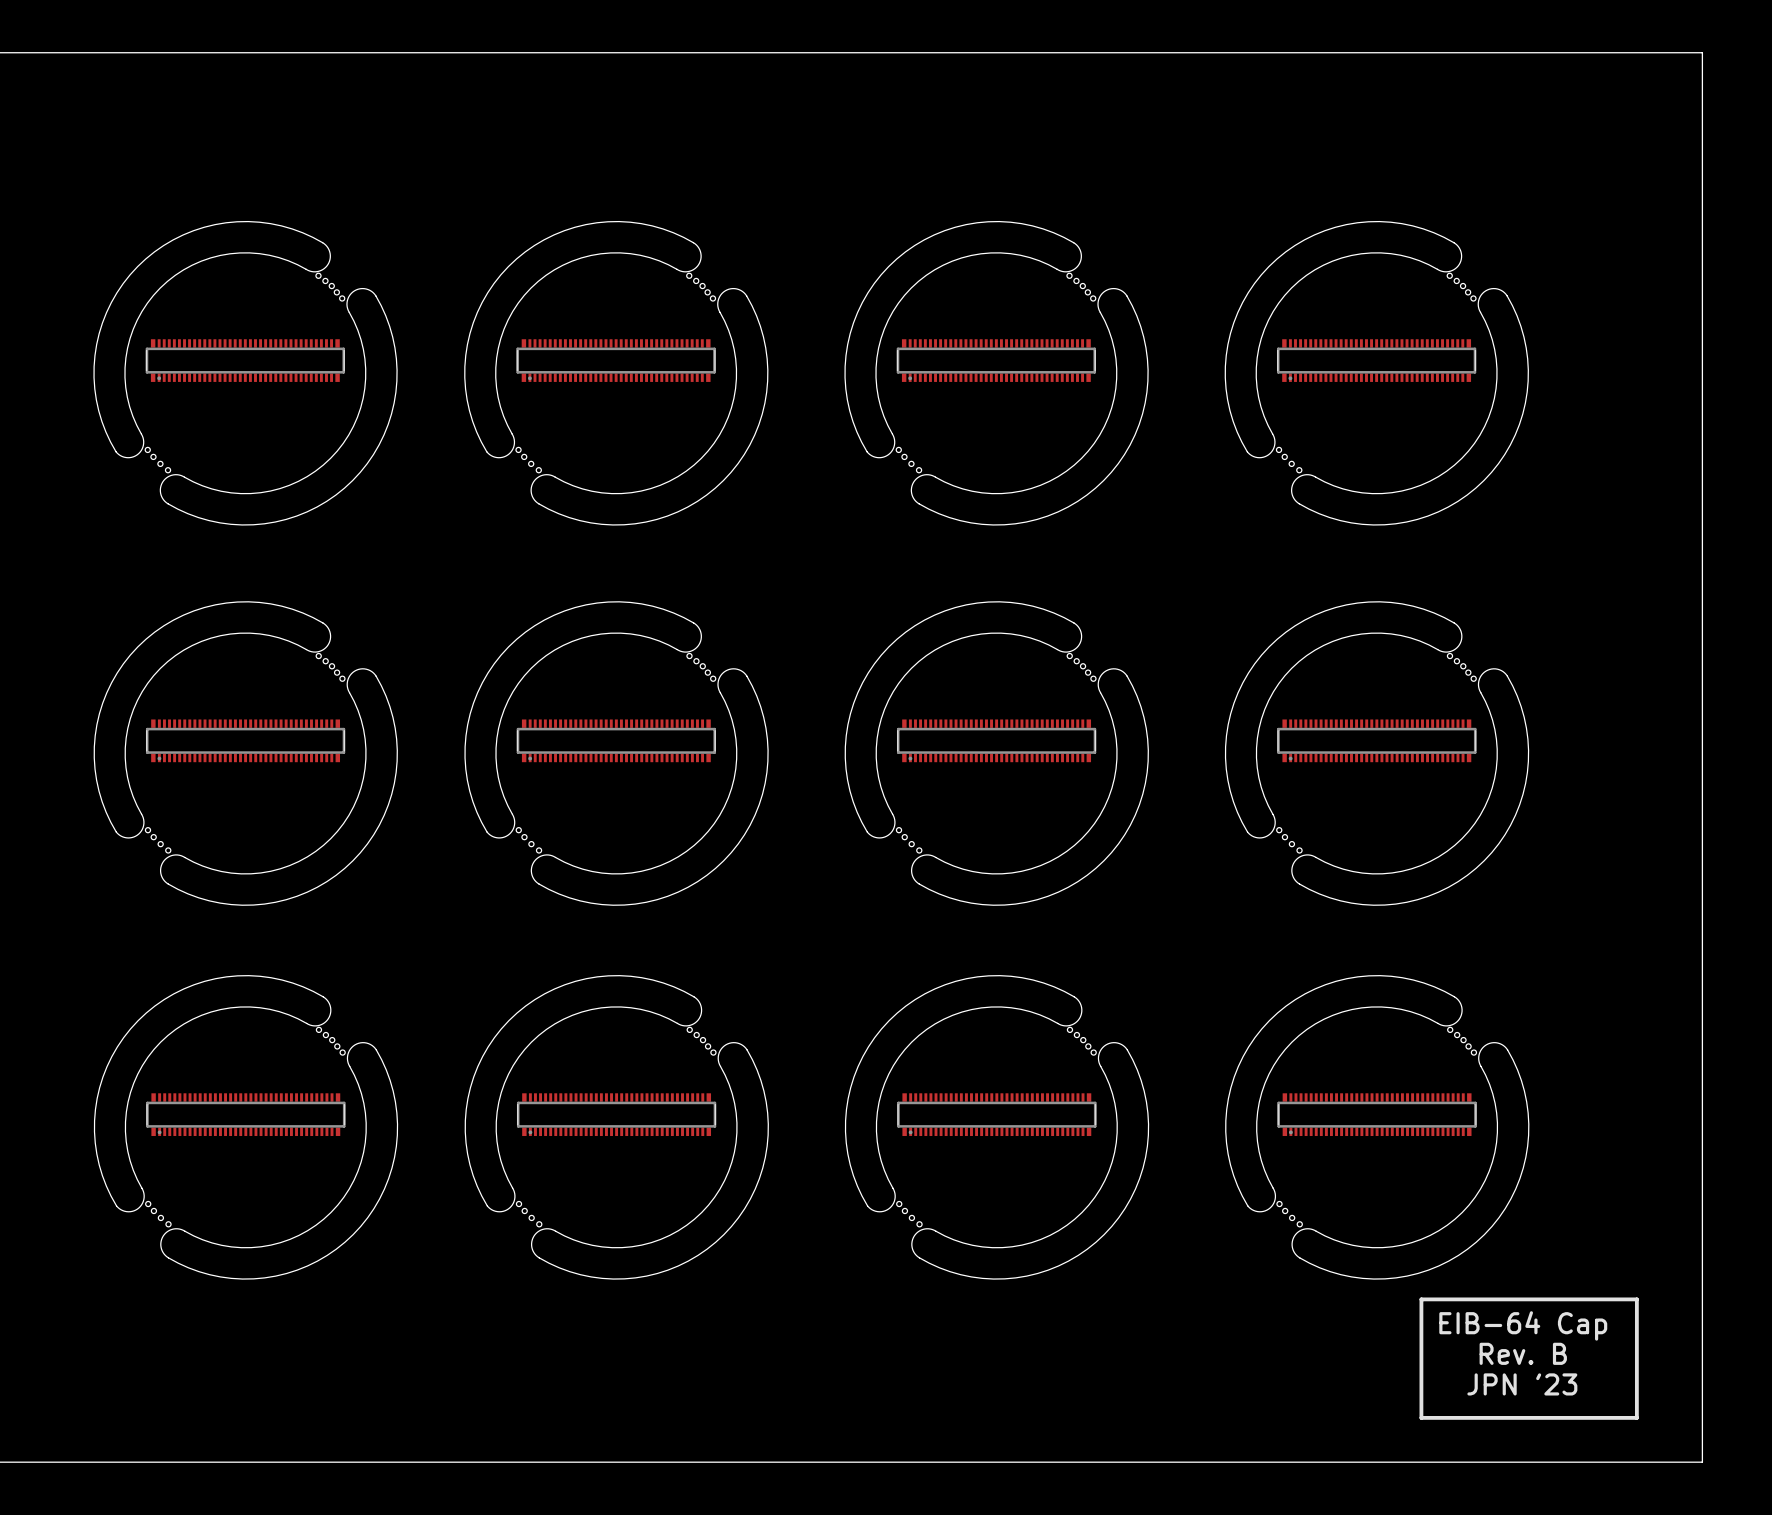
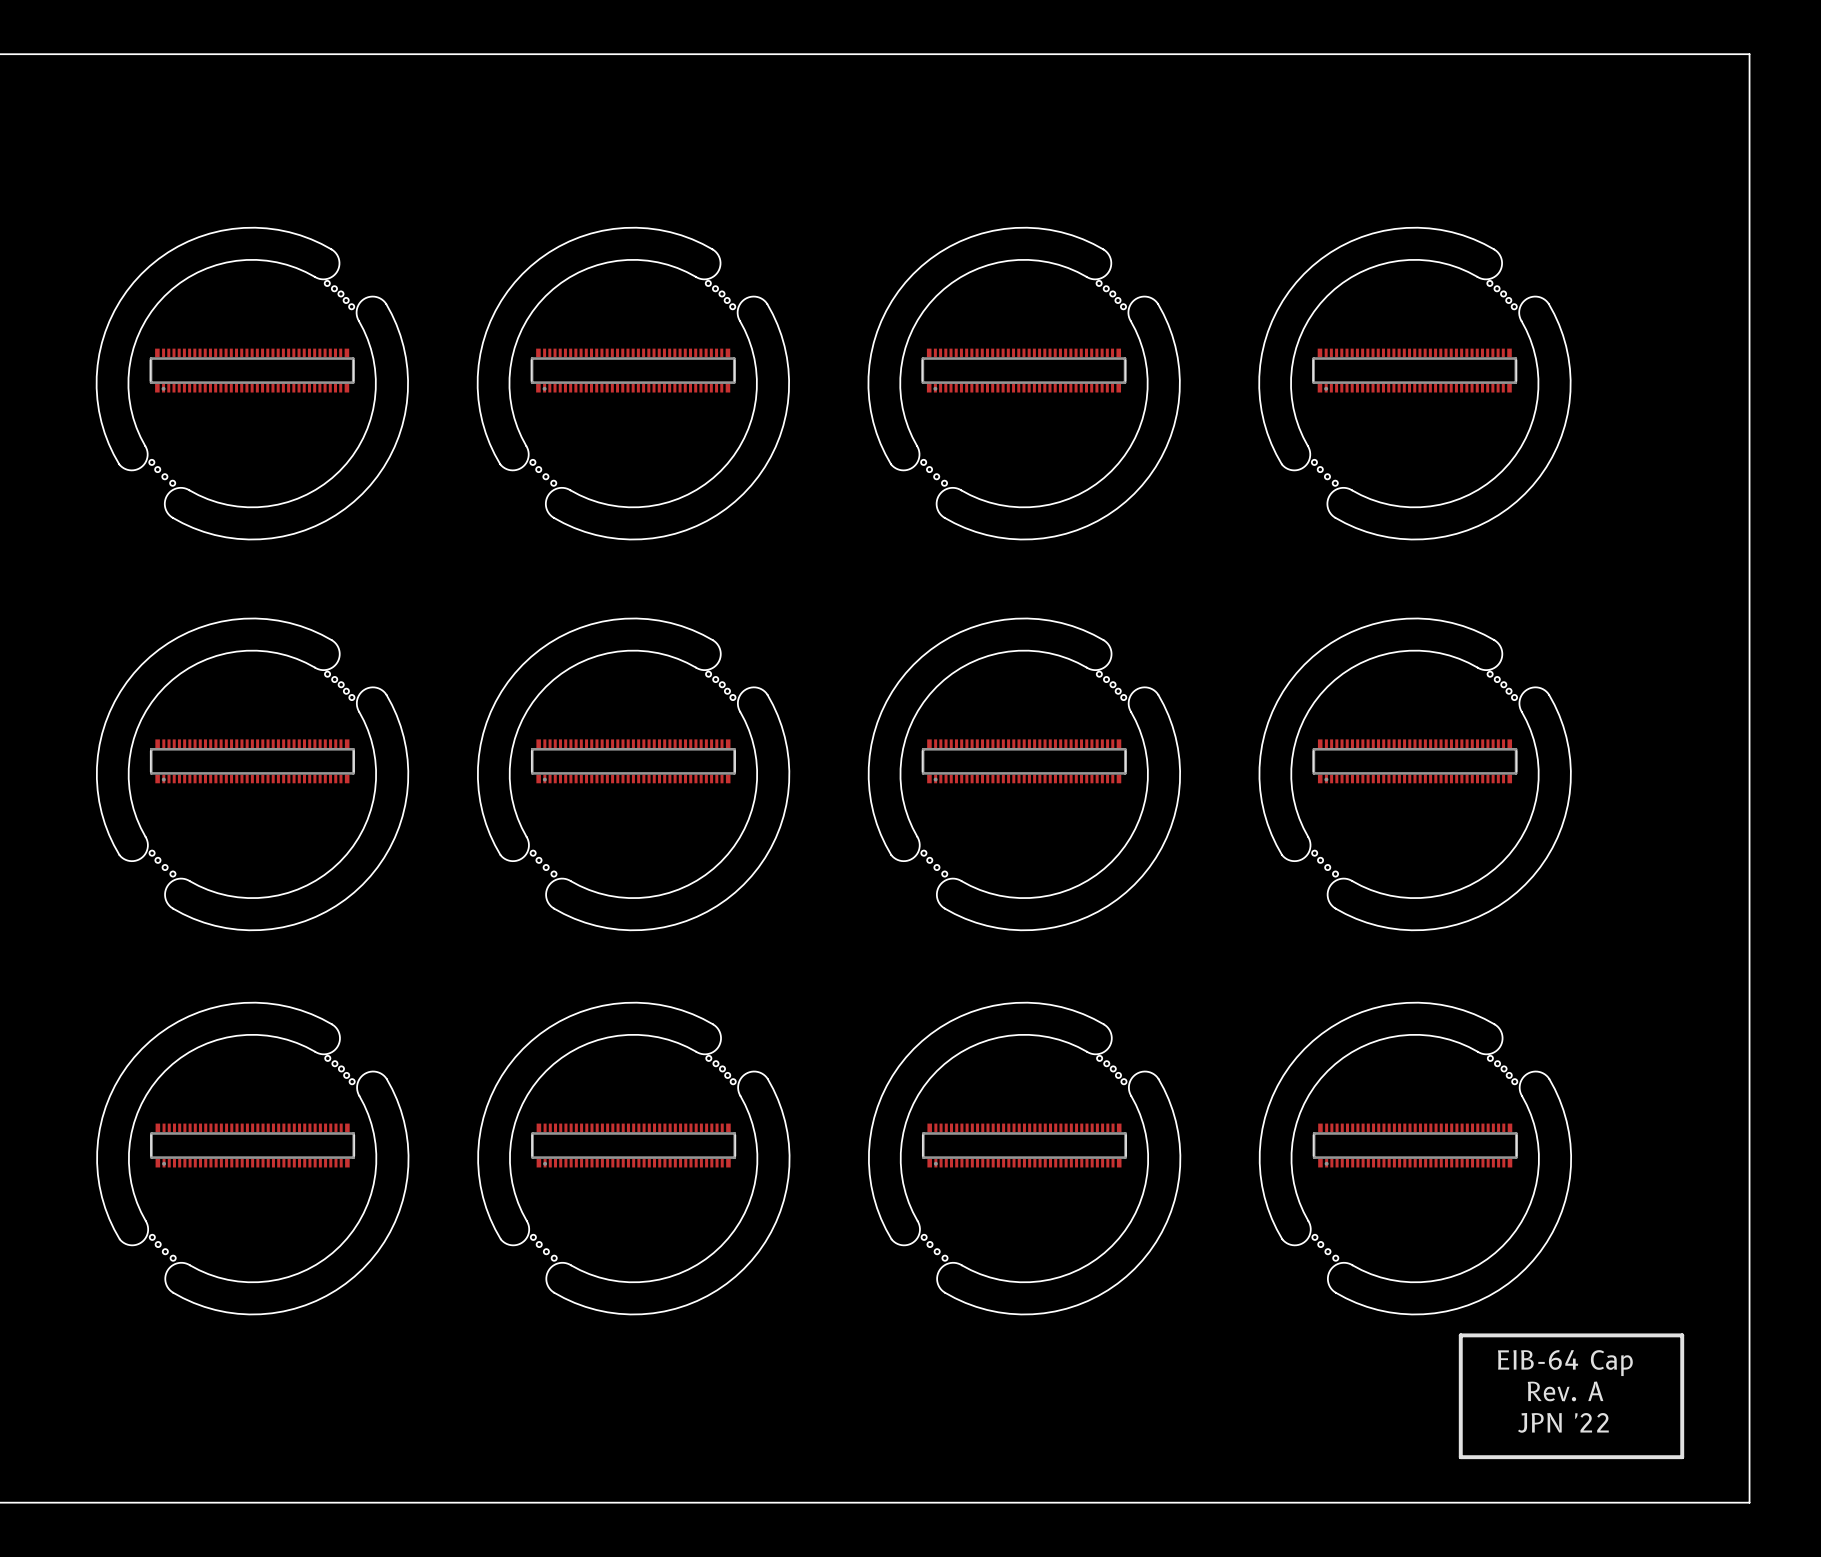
text: Rev. B (1523, 1353) -> Rev. A (1565, 1391)
text: JPN '23 (1522, 1384) -> JPN '22 (1563, 1422)

